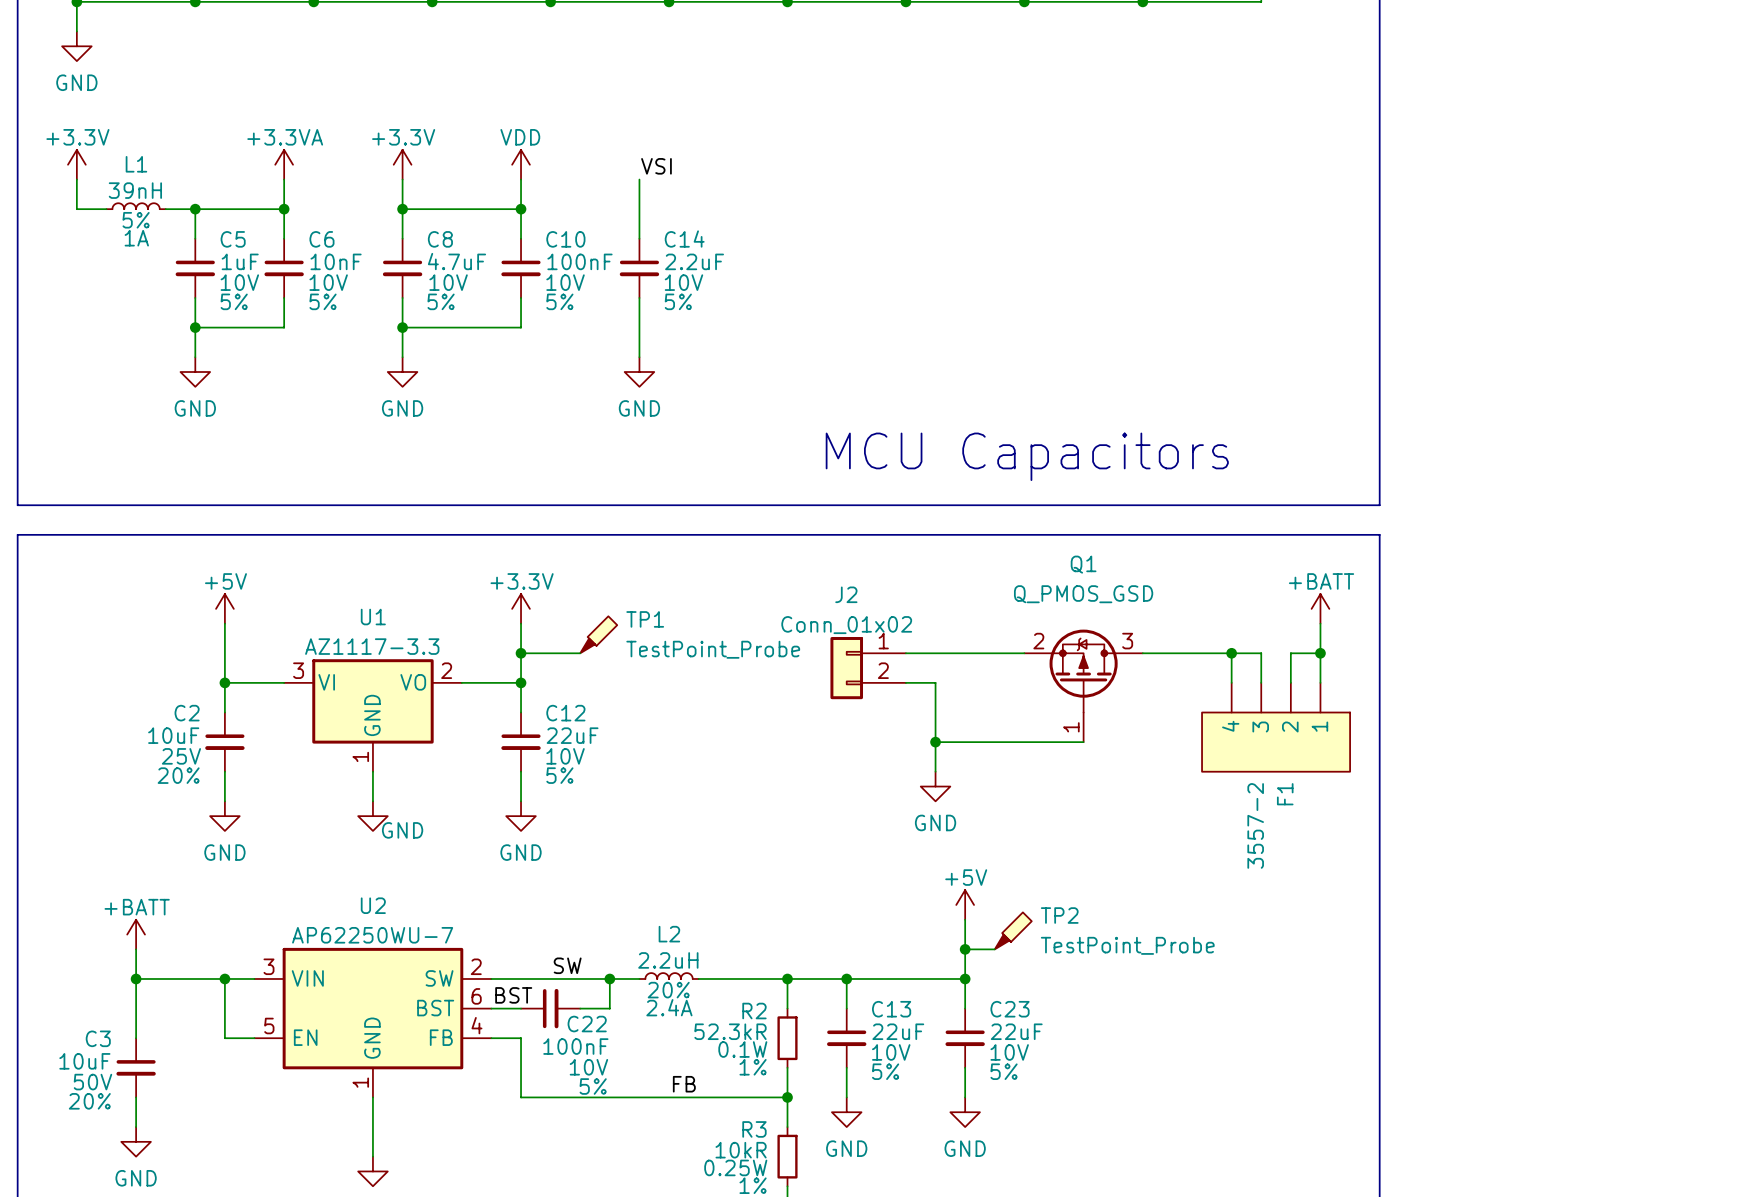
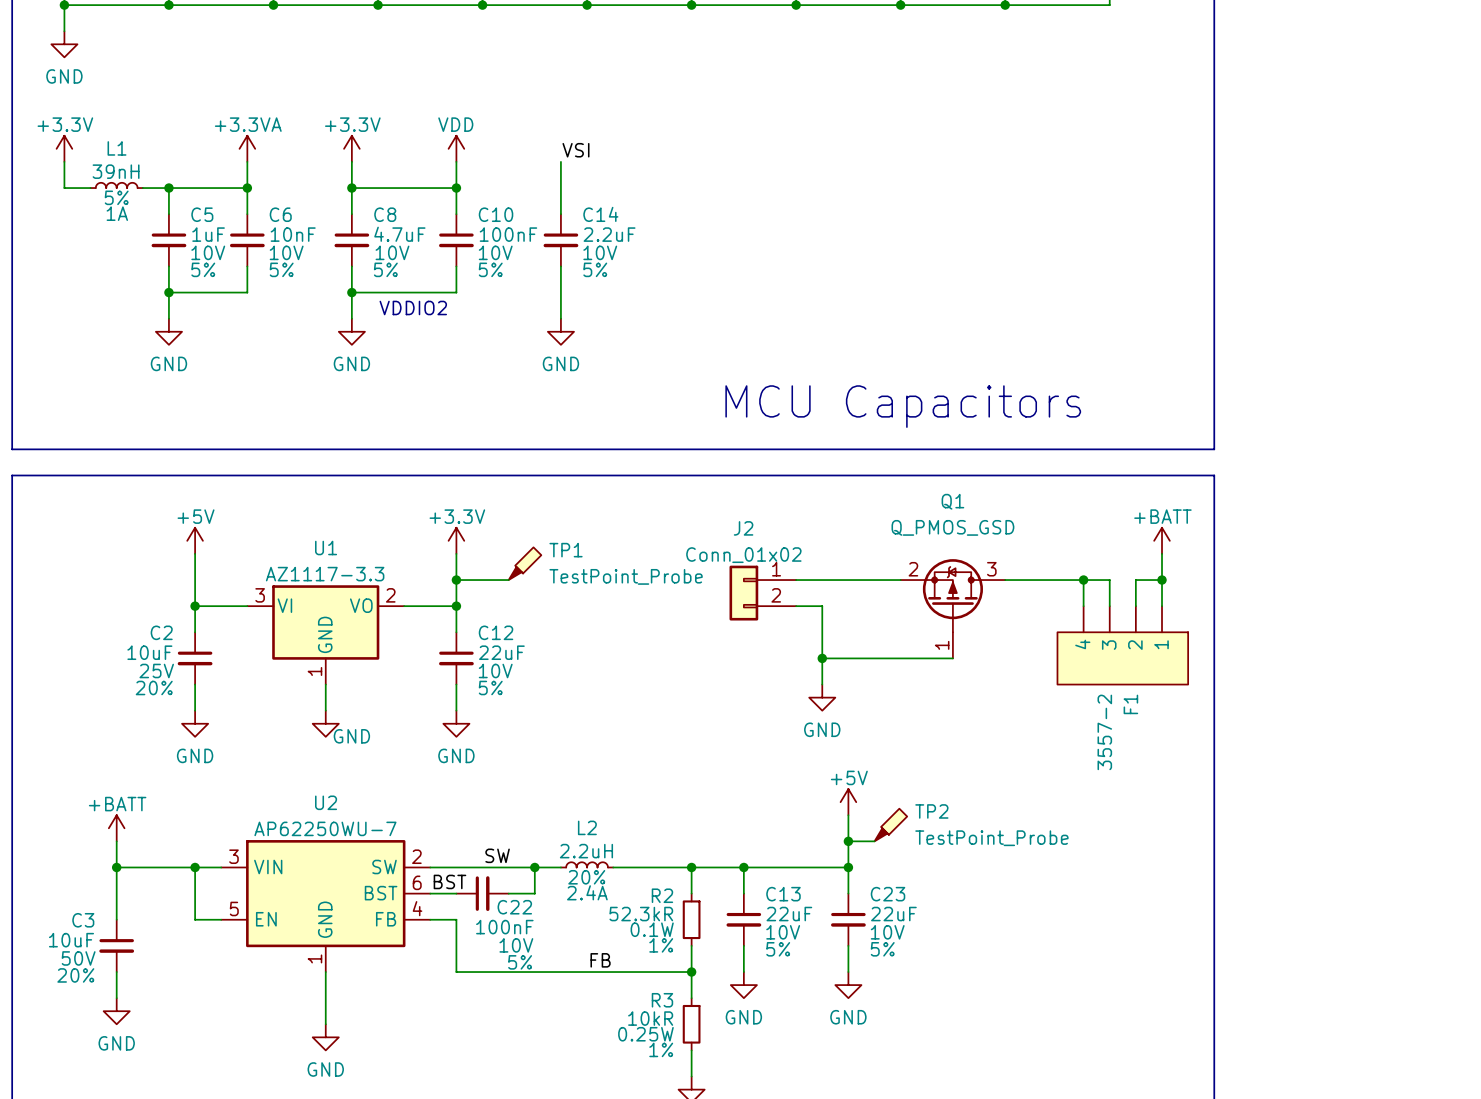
text: none -> VDDIO2 (413, 307)

